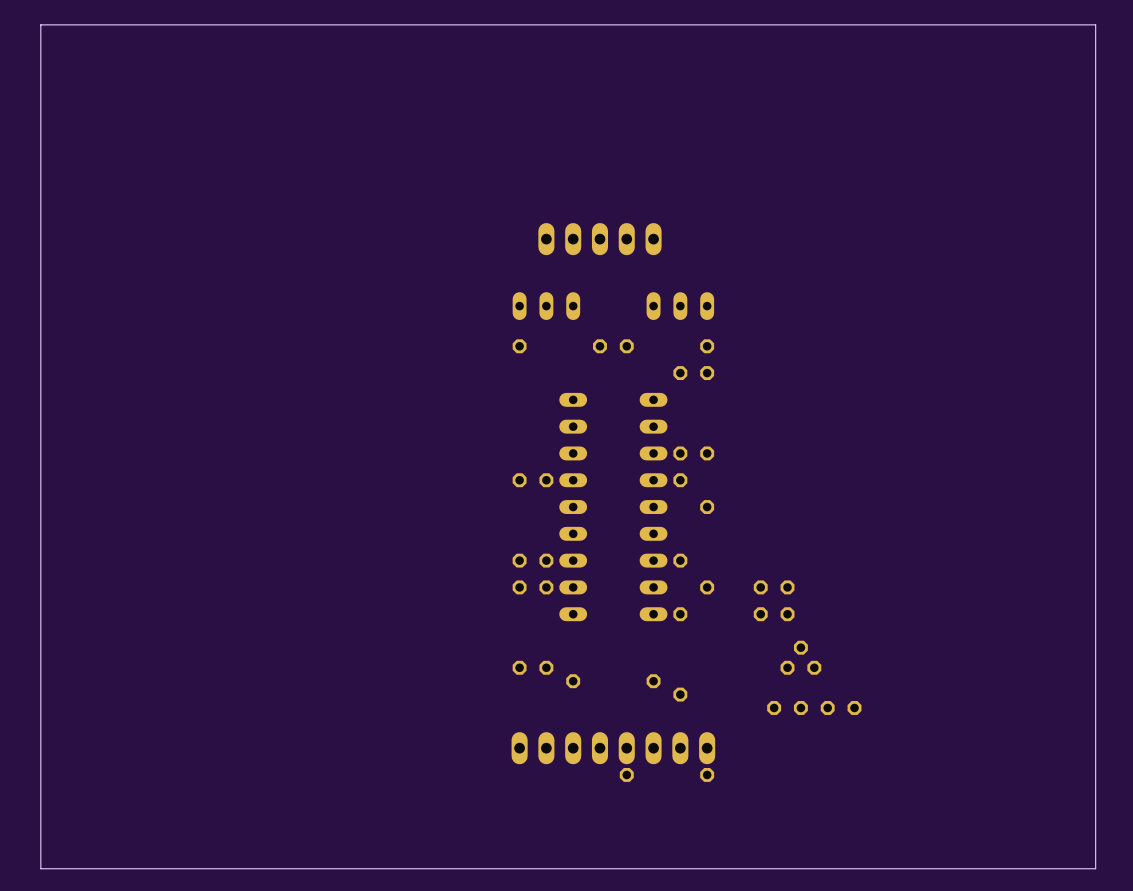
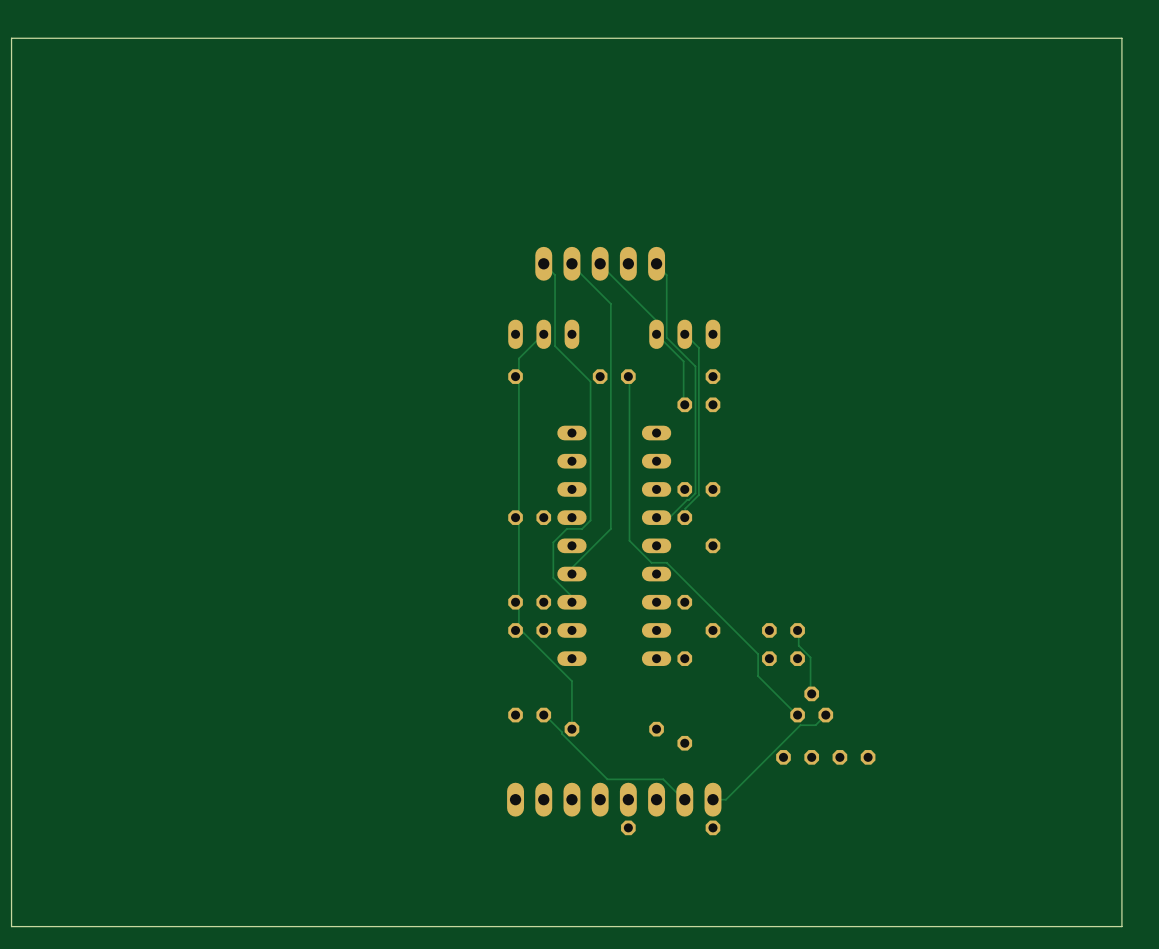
track: none -> (543, 263) (555, 275) (555, 346) (590, 381) (590, 520) (582, 528) (566, 528) (553, 542) (553, 577) (571, 596) (571, 602)
track: none -> (571, 263) (610, 303) (610, 528) (571, 567) (571, 574)
track: none -> (600, 263) (656, 320) (656, 334) (683, 361) (684, 404)
track: none -> (656, 263) (666, 275) (666, 337) (695, 366) (695, 493) (670, 517) (656, 517)
track: none -> (543, 334) (518, 358) (518, 628) (571, 681) (571, 729)
track: none -> (684, 334) (698, 347) (698, 495) (685, 508) (684, 517)
track: none -> (628, 376) (629, 540) (651, 562) (666, 562) (758, 654) (758, 676) (797, 715)
track: none -> (797, 630) (798, 645) (810, 657) (811, 693)
track: none -> (543, 715) (607, 779) (663, 779) (684, 799)
track: none -> (825, 715) (815, 725) (800, 725) (725, 799) (712, 799)

